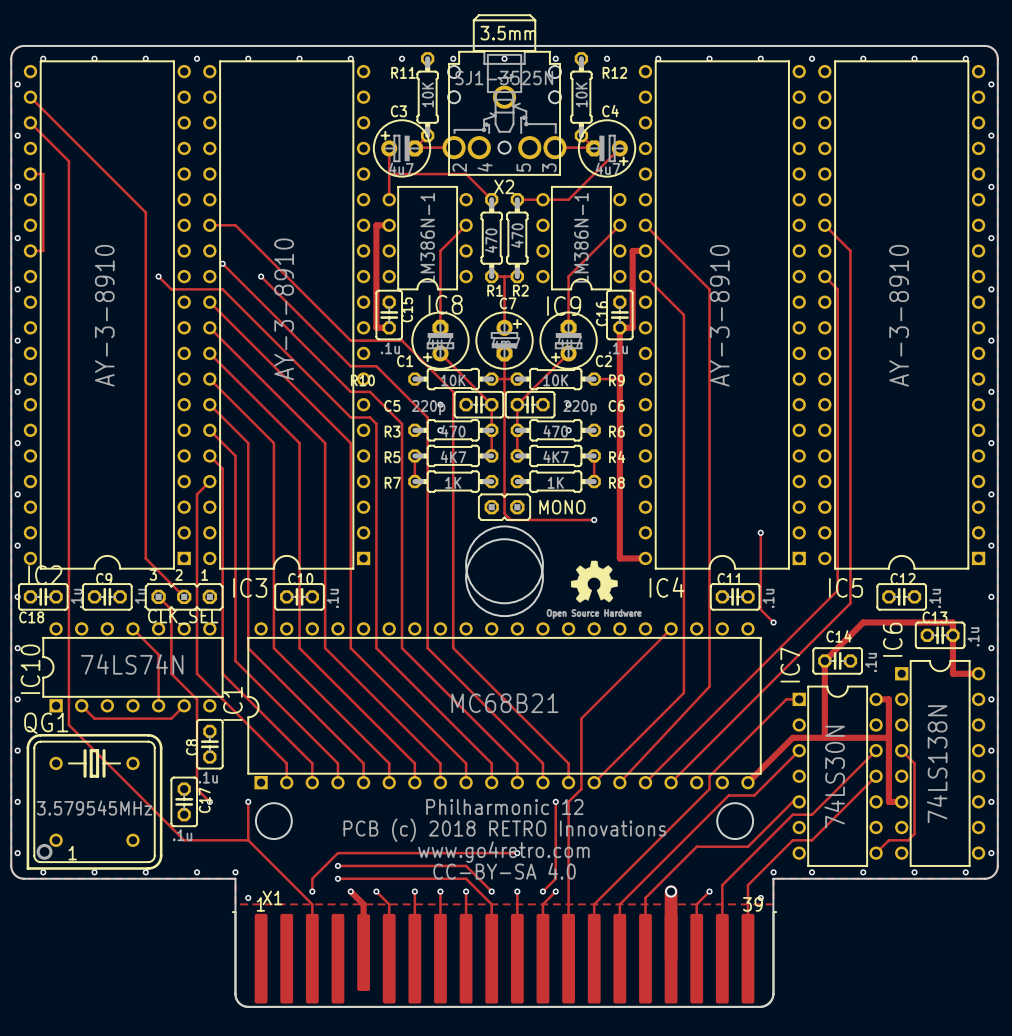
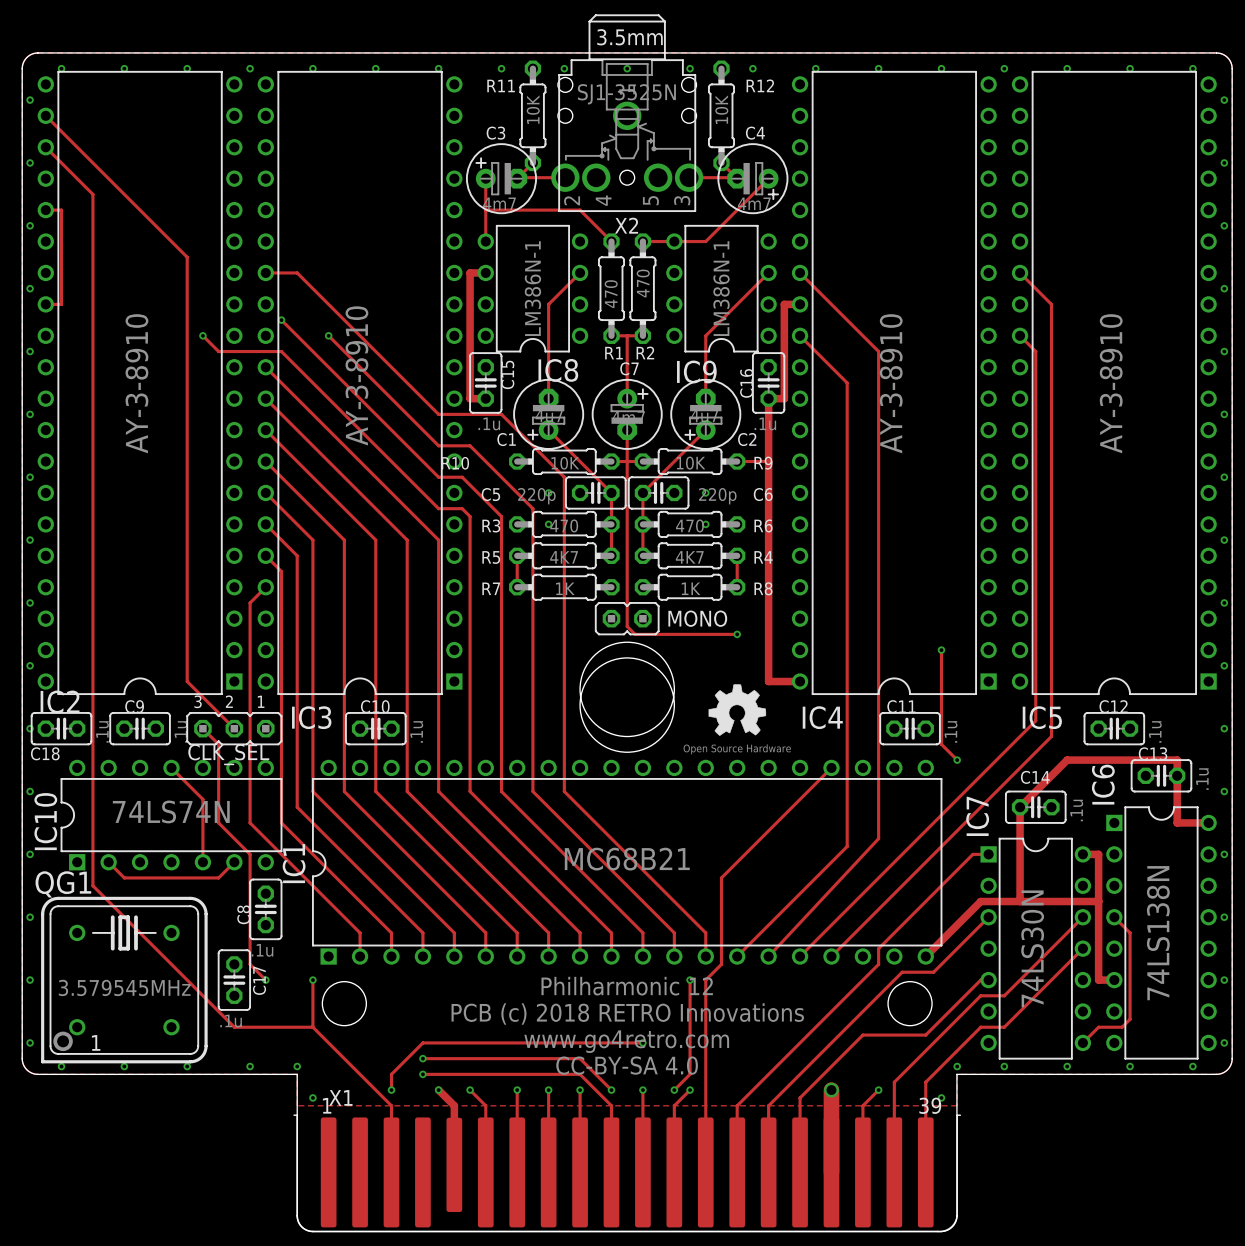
C3 value: 4u7 (401, 168) -> 4m7 (499, 203)
C4 value: 4u7 (608, 168) -> 4m7 (754, 203)

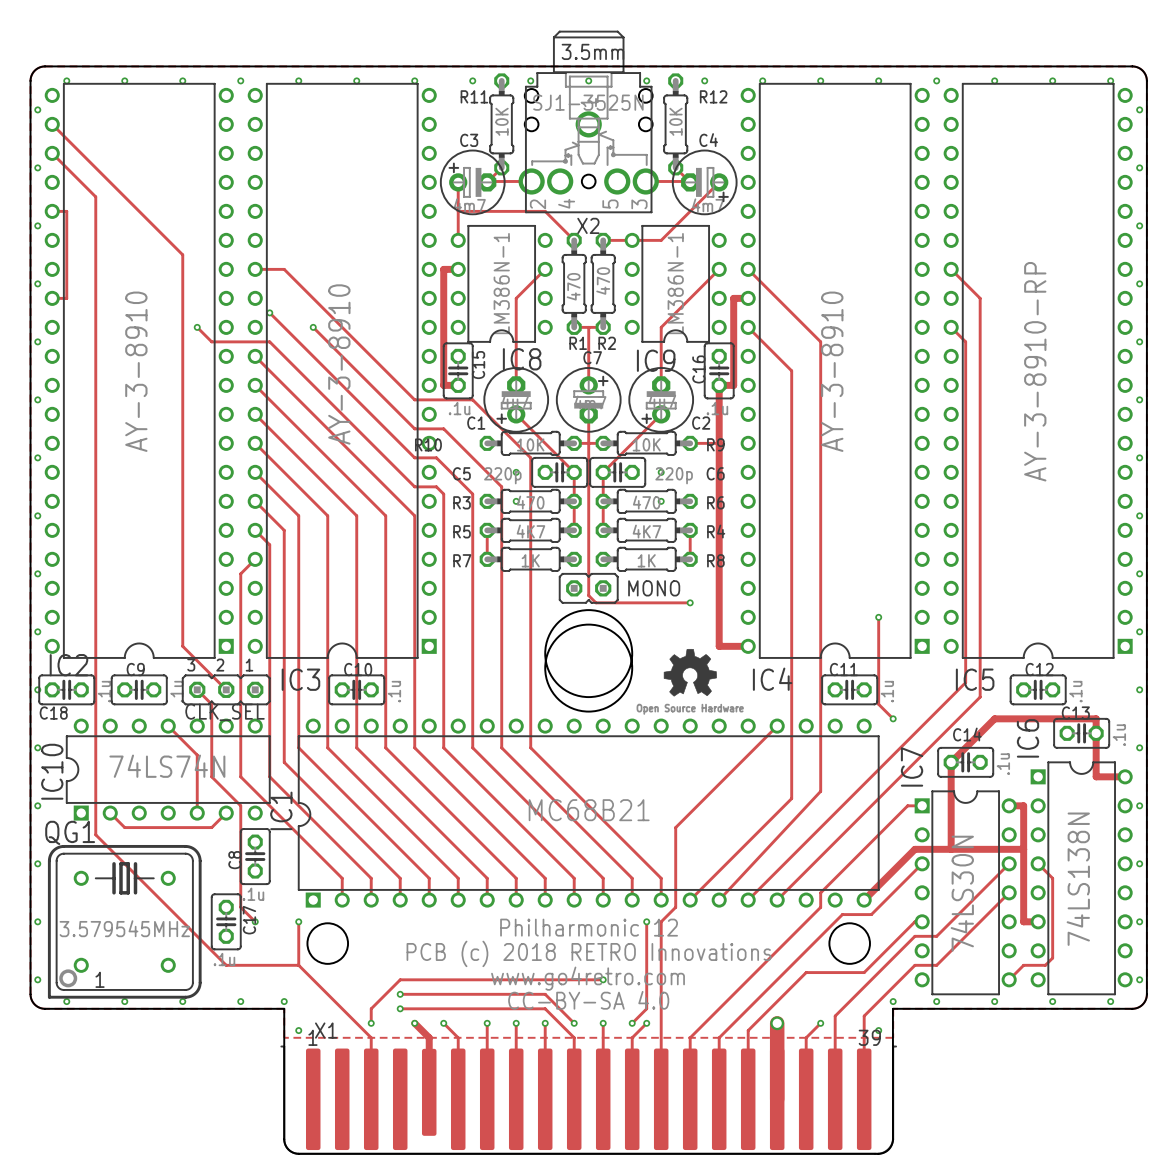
IC5 value: AY-3-8910 (1111, 383) -> AY-3-8910-RP (1035, 371)

